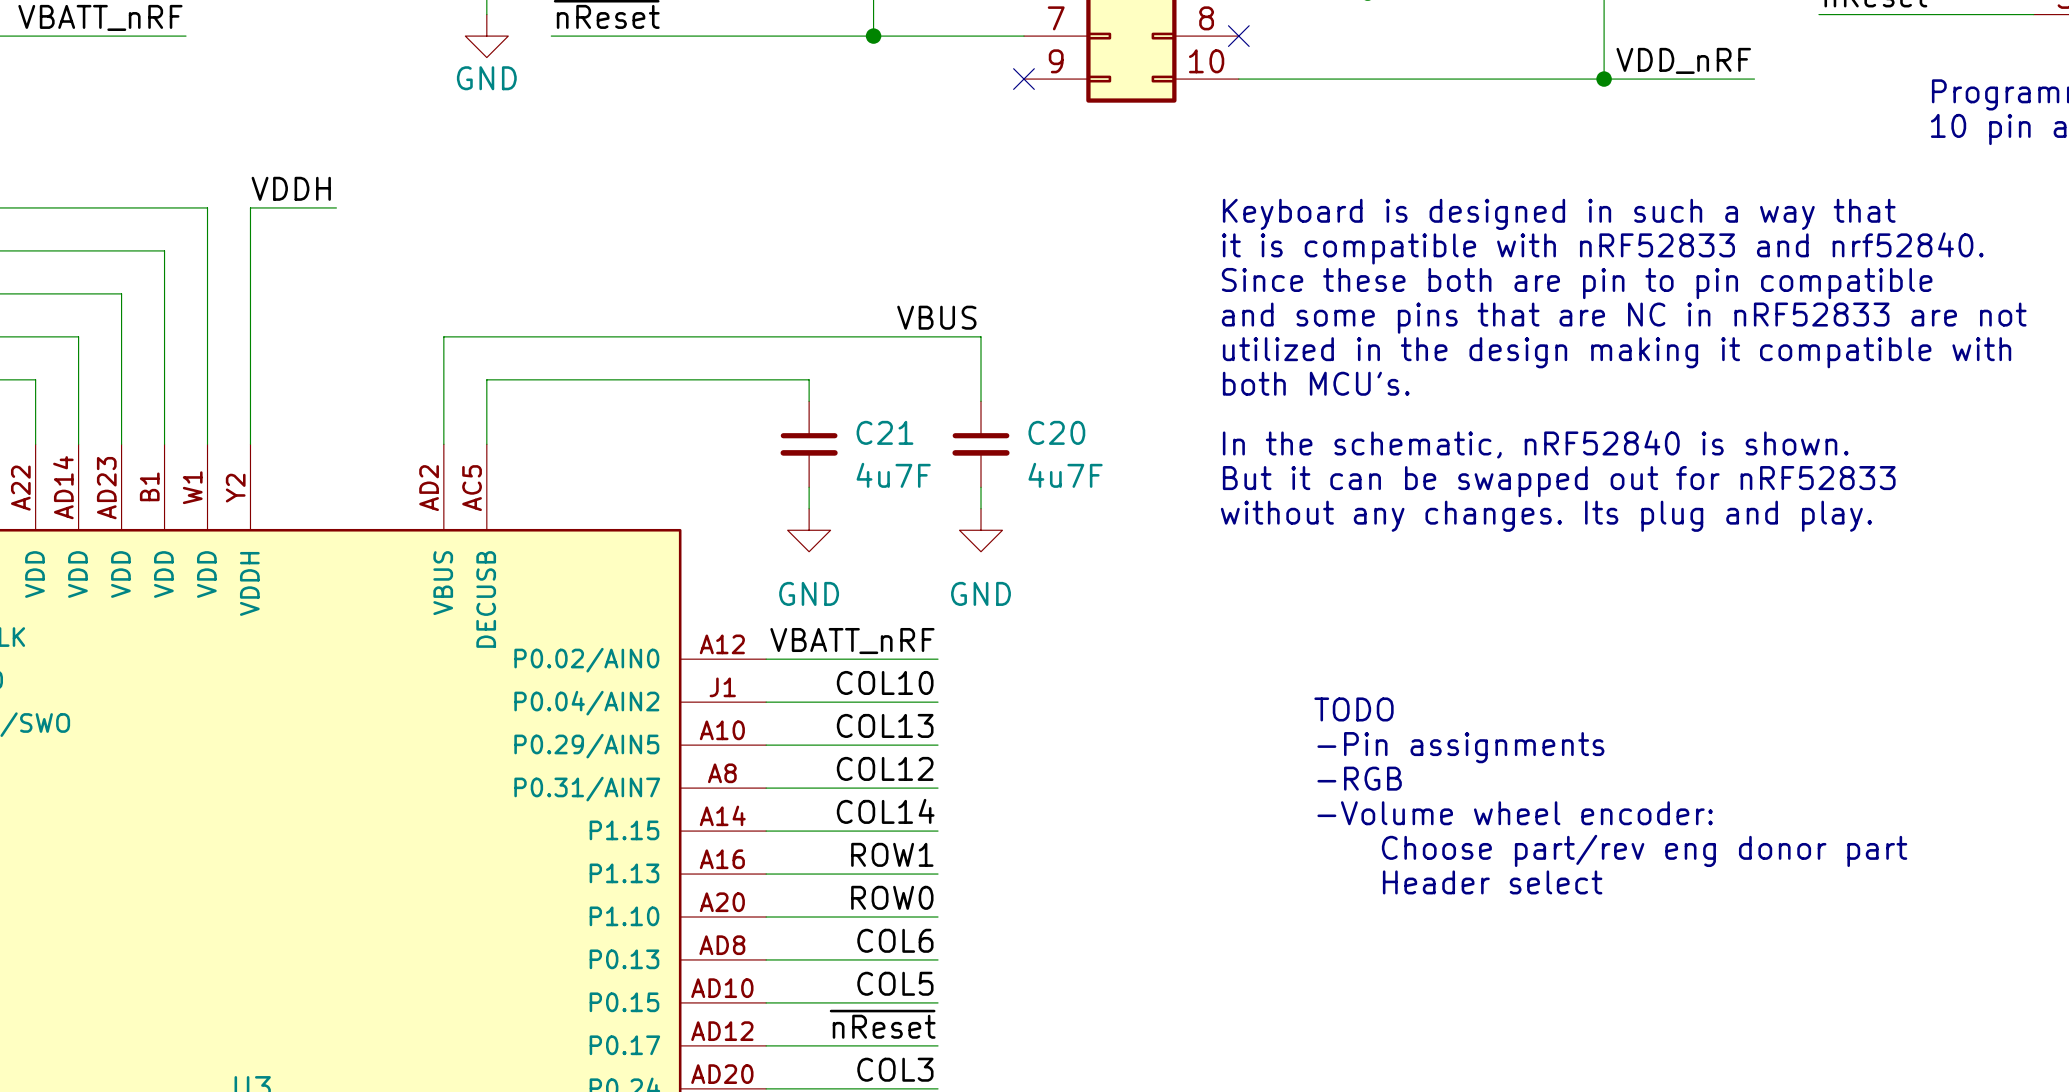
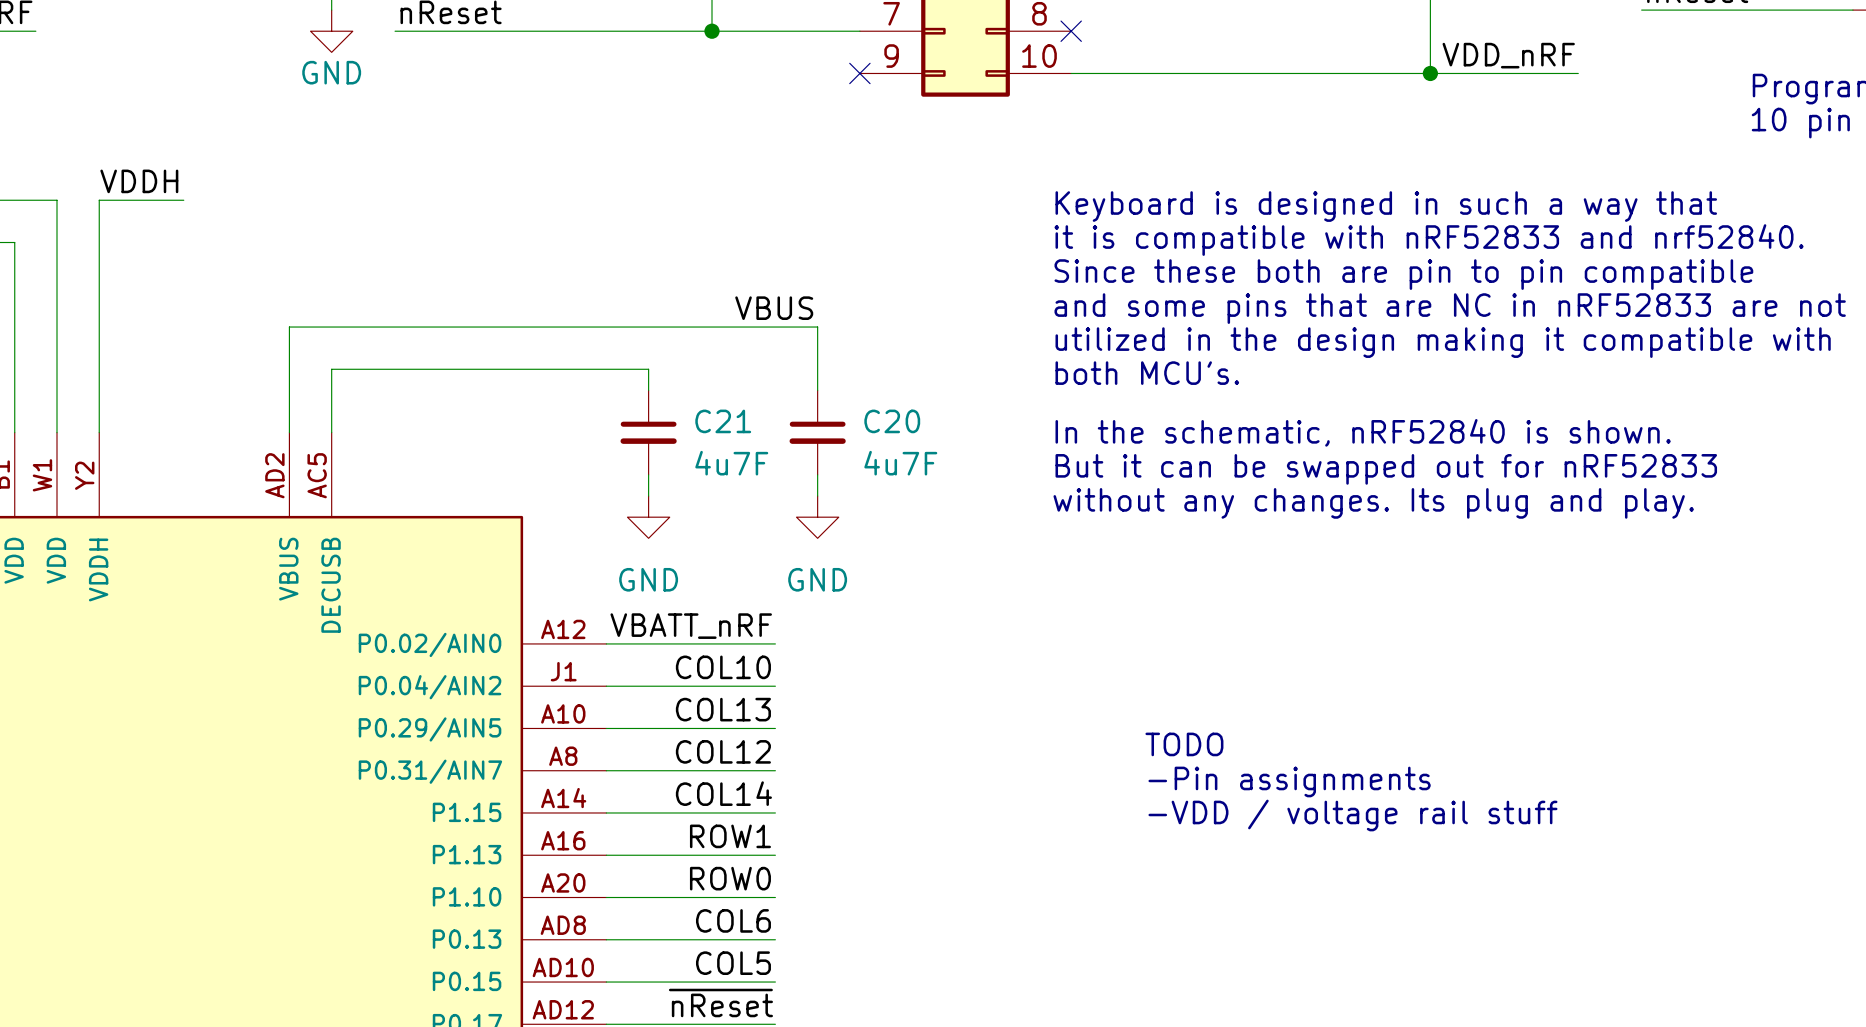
text position: TODO (1353, 709) -> TODO (1184, 744)
text position: -Pin assignments (1460, 747) -> -Pin assignments (1289, 781)
text: -RGB (1359, 778) -> none
text: -Volume wheel encoder: (1515, 813) -> none
text: none -> -VDD / voltage rail stuff (1352, 815)
text: Choose part/rev eng donor part (1644, 850) -> none
text: Header select (1492, 882) -> none

